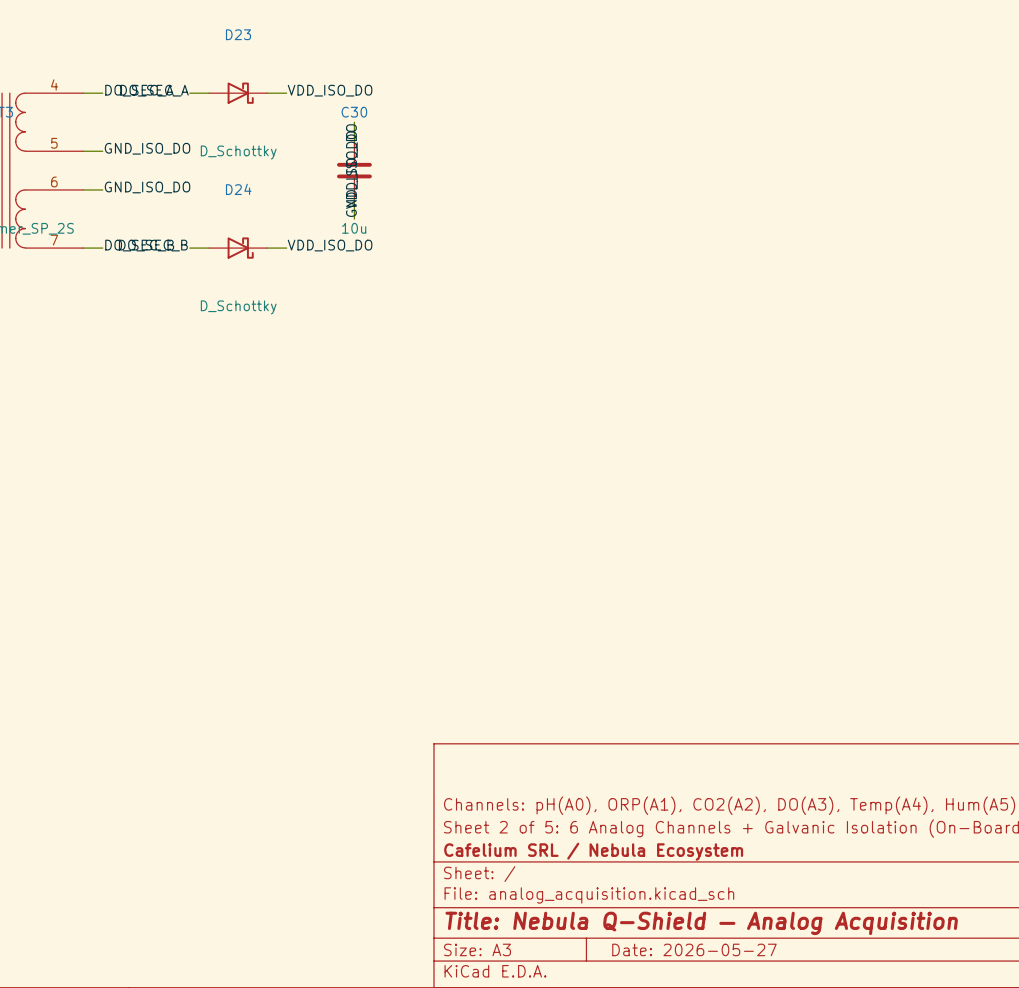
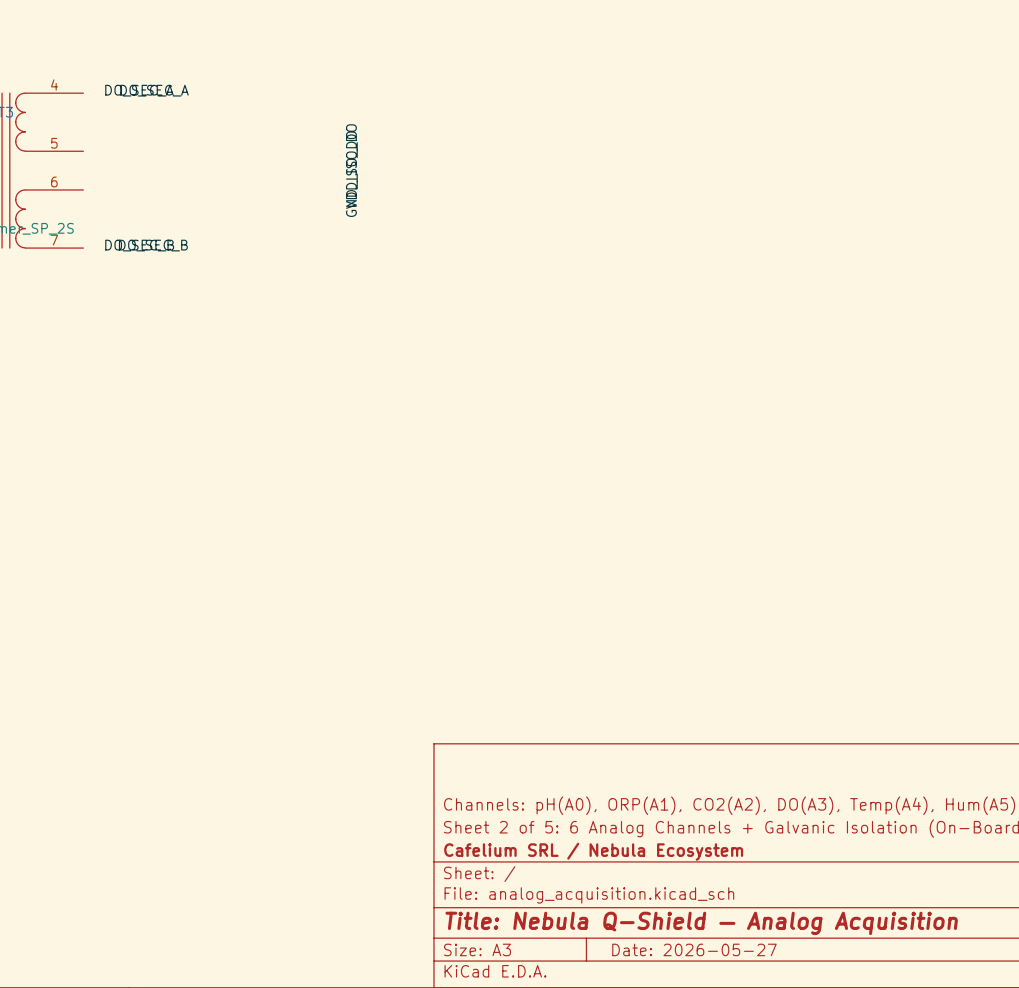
label: VDD_ISO_DO (330, 90) -> none
wire: (83, 93) (102, 93) -> none
wire: (189, 93) (209, 93) -> none
D23: D_Schottky (238, 93) -> none
wire: (267, 93) (286, 93) -> none
wire: (354, 122) (354, 141) -> none
label: GND_ISO_DO (147, 148) -> none
wire: (83, 151) (102, 151) -> none
C30: 10u (354, 170) -> none
label: GND_ISO_DO (147, 187) -> none
wire: (83, 189) (102, 189) -> none
wire: (354, 199) (354, 219) -> none
label: VDD_ISO_DO (330, 245) -> none
wire: (83, 248) (102, 248) -> none
wire: (189, 248) (209, 248) -> none
D24: D_Schottky (238, 248) -> none
wire: (267, 248) (286, 248) -> none

